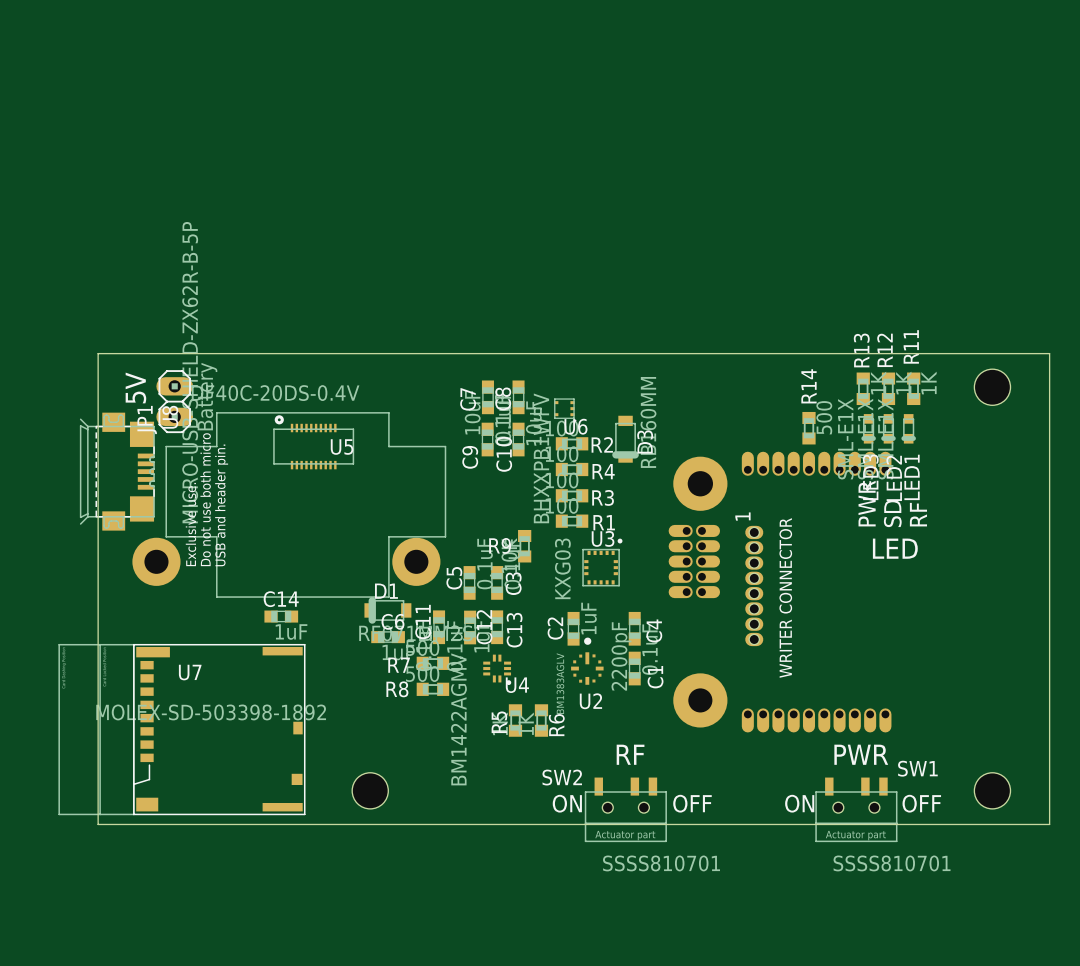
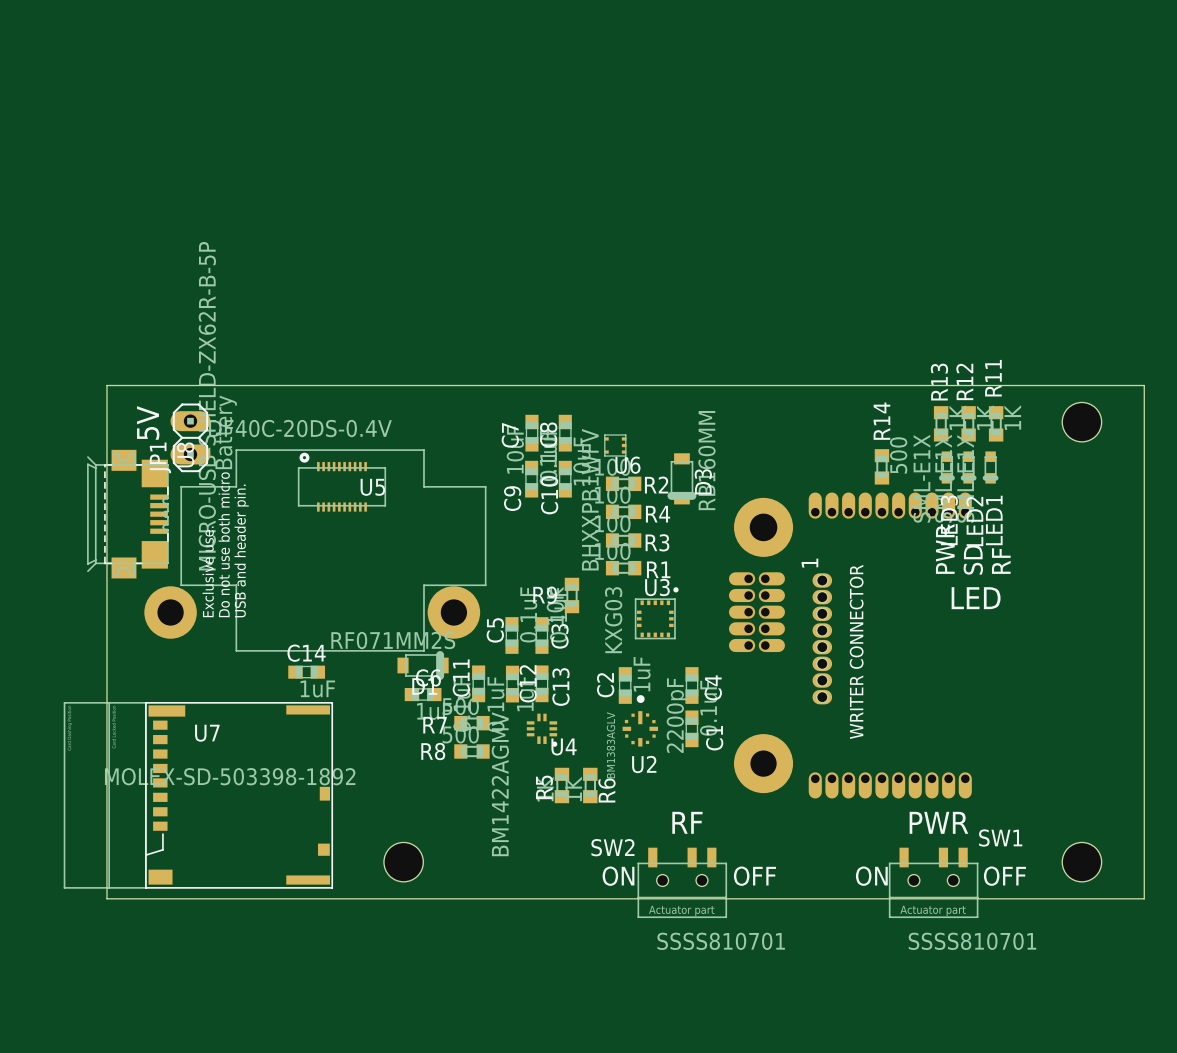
D1 rotation: 0° (387, 610) -> 180° (423, 665)

